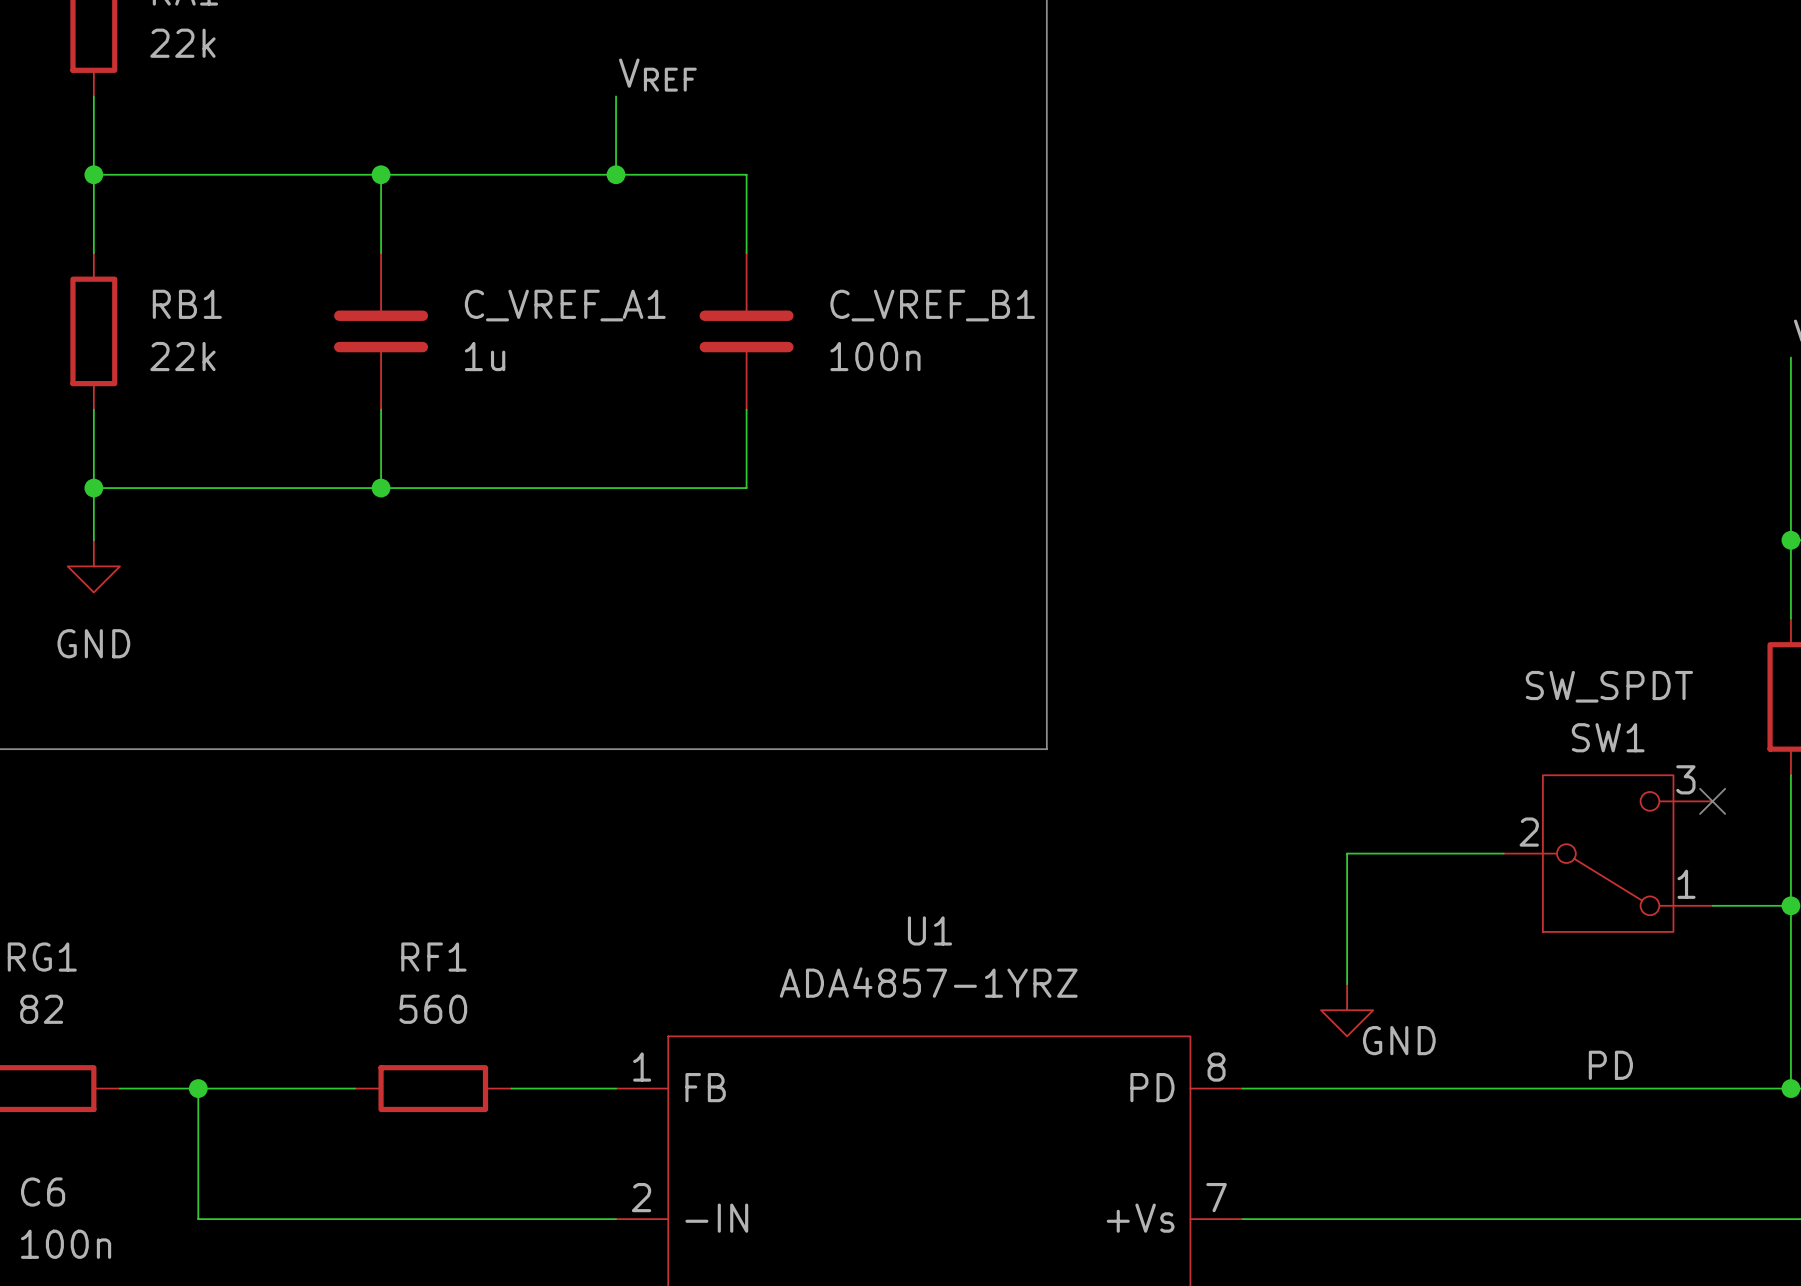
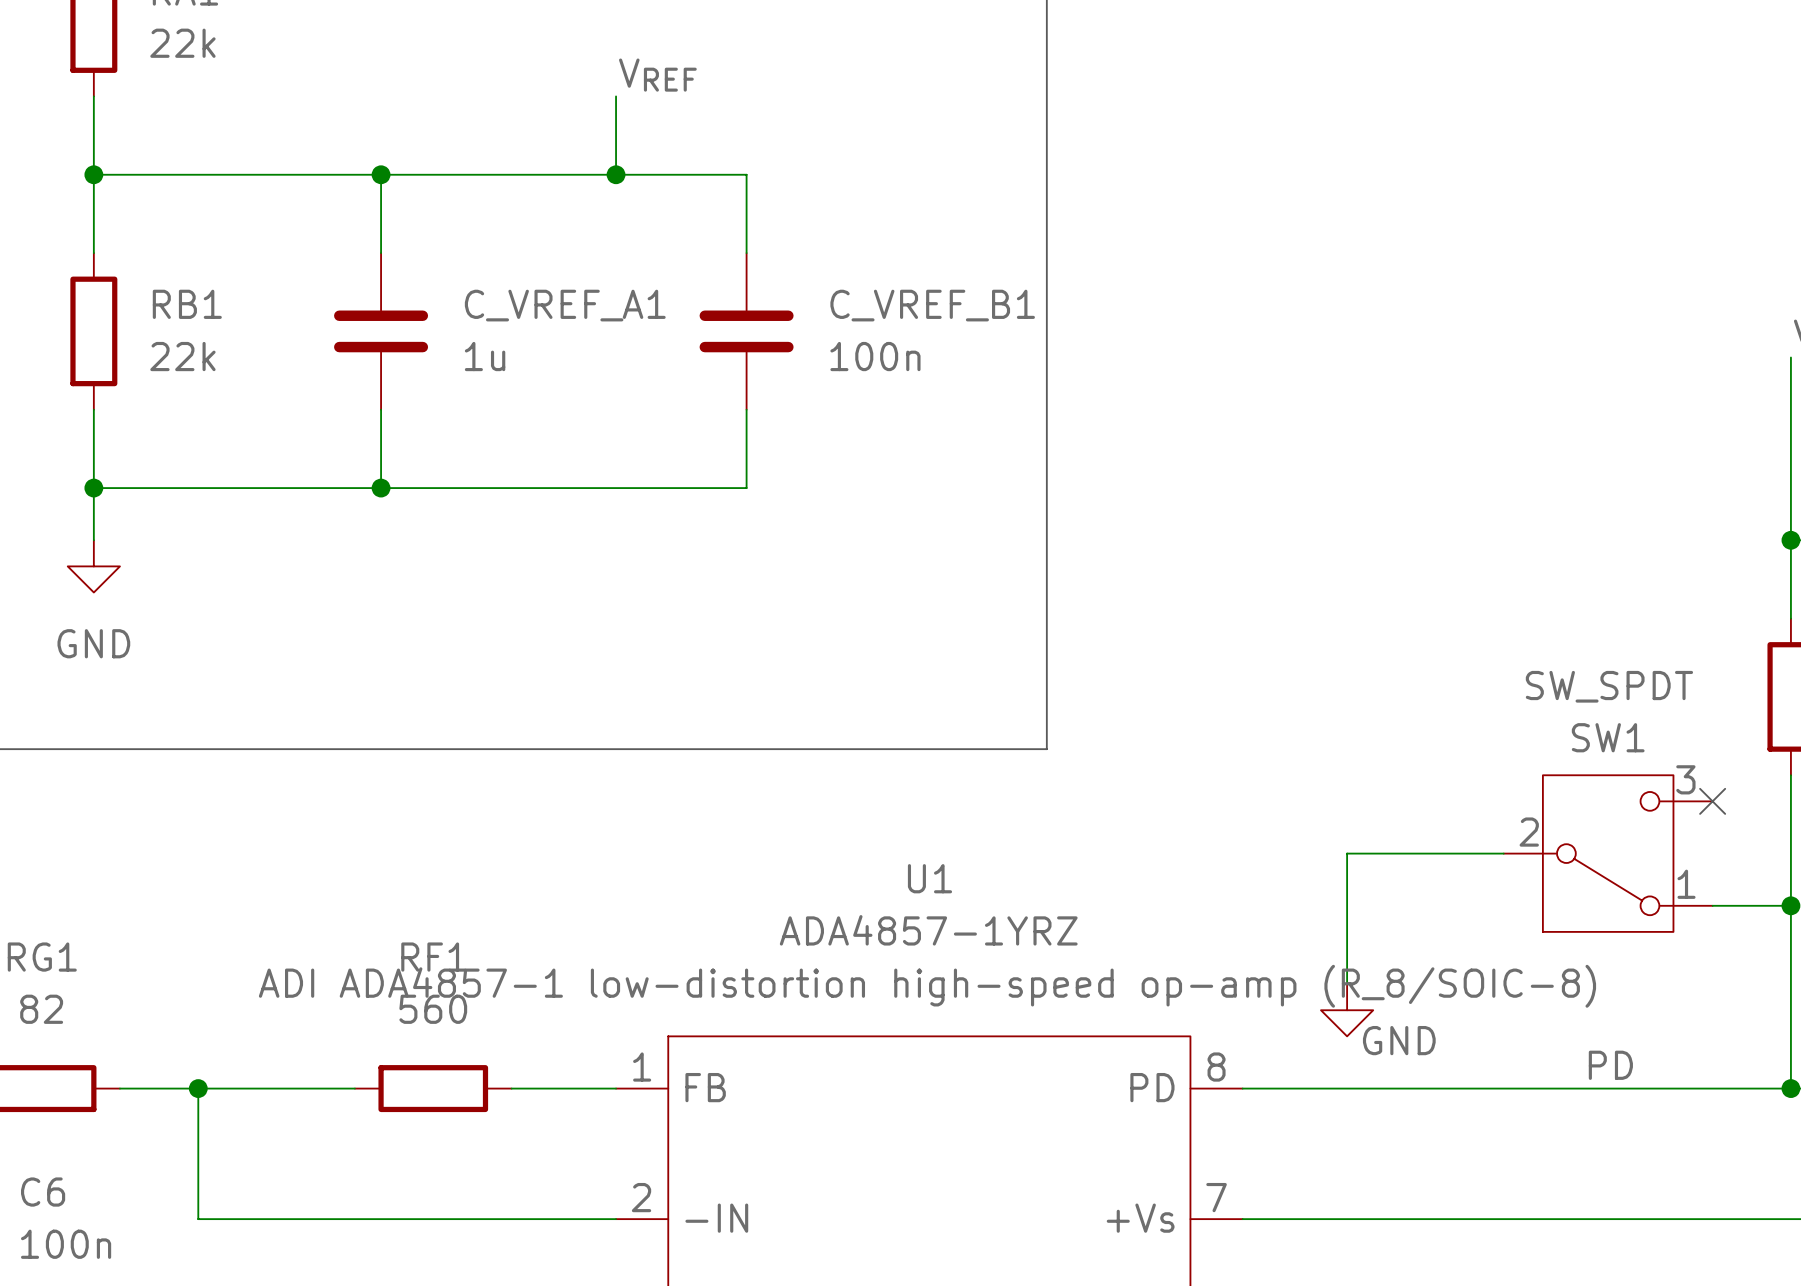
U1 name position: U1 (929, 930) -> U1 (929, 878)
U1 value position: ADA4857-1YRZ (928, 982) -> ADA4857-1YRZ (928, 930)
U1 text: none -> ADI ADA4857-1 low-distortion high-speed op-amp (R_8/SOIC-8) (927, 986)

